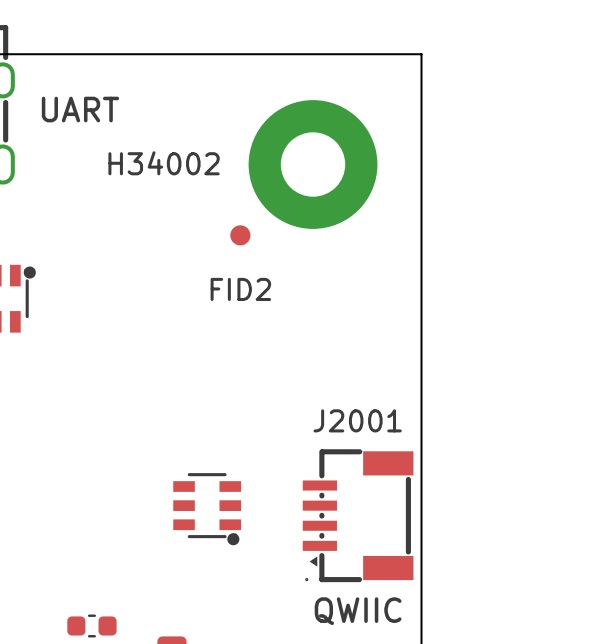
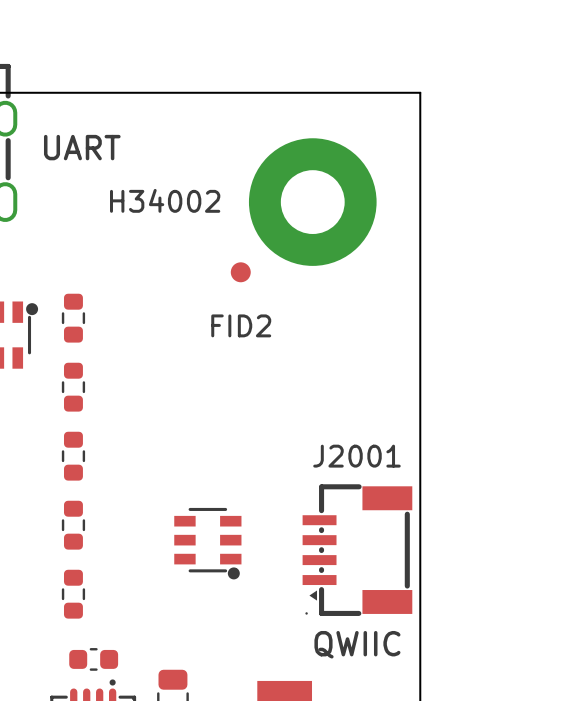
part: none -> (73, 318)
part: none -> (73, 387)
part: none -> (73, 456)
part: none -> (73, 525)
part: none -> (73, 594)

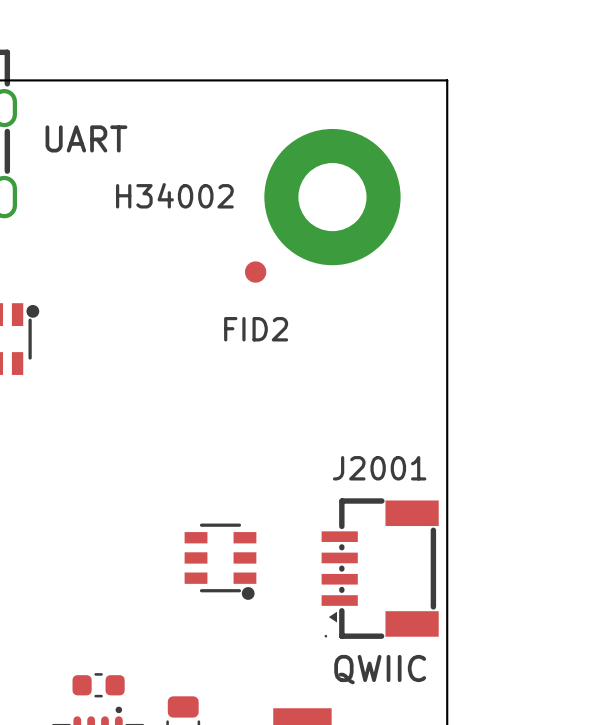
part: (73, 318) -> none
part: (73, 387) -> none
part: (73, 456) -> none
part: (73, 525) -> none
part: (73, 594) -> none

